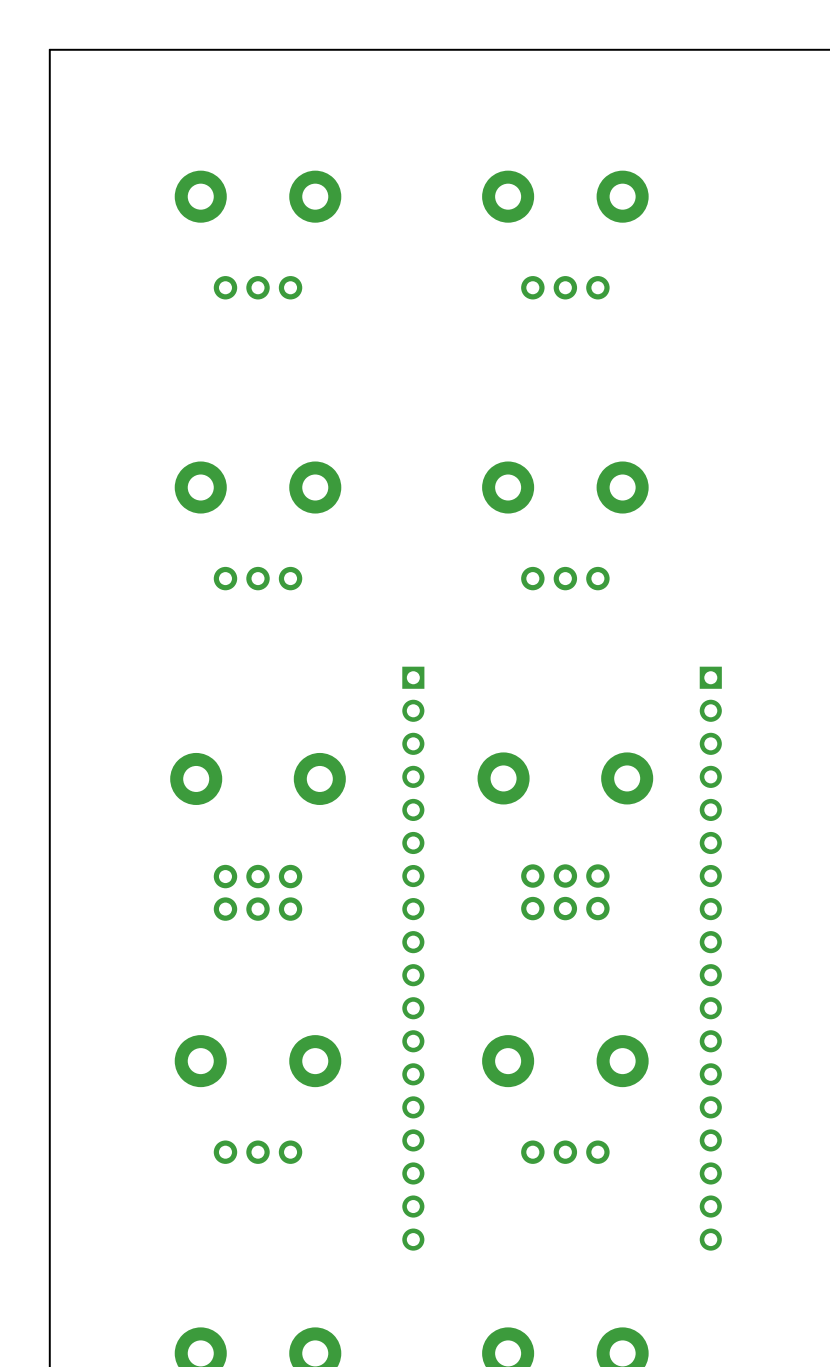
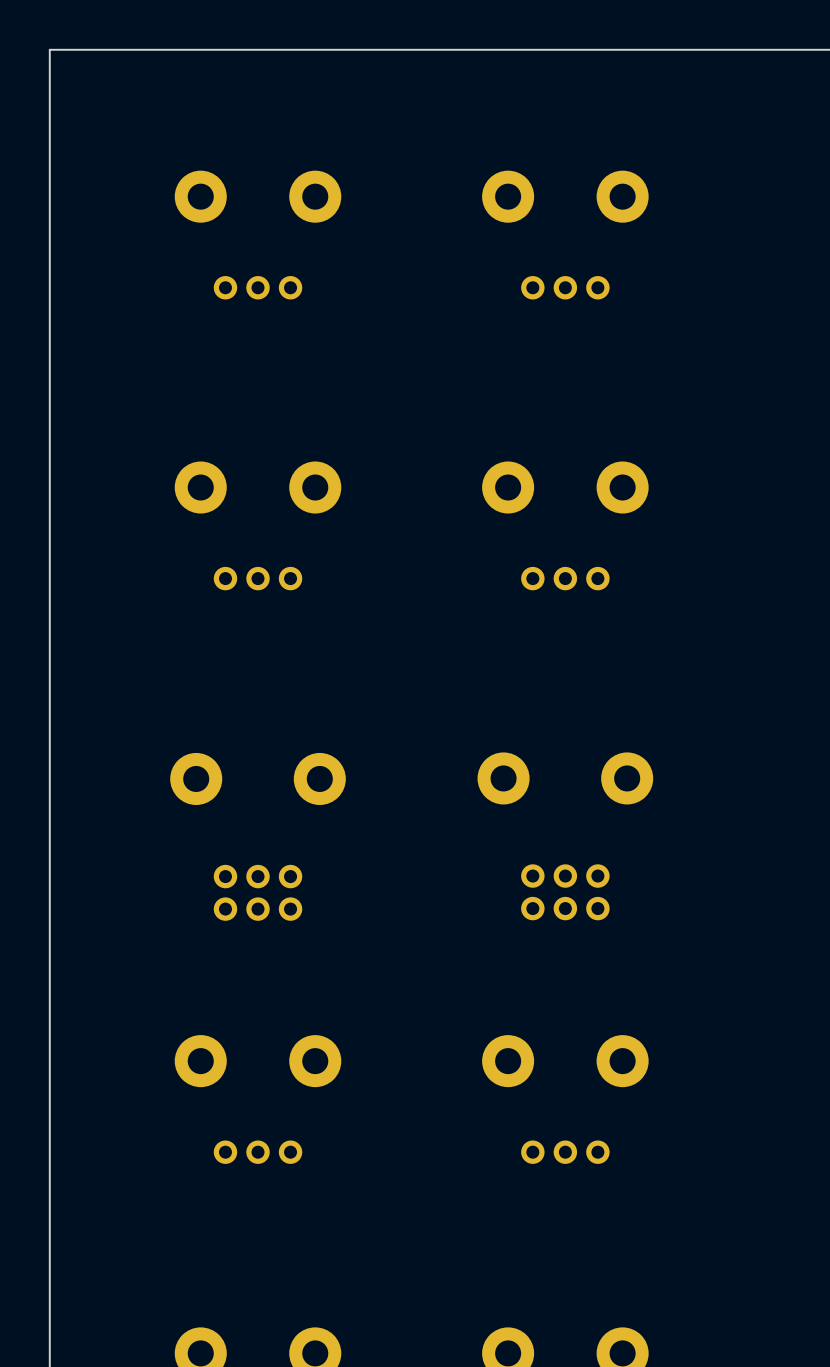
part: (413, 958) -> none
part: (710, 958) -> none

